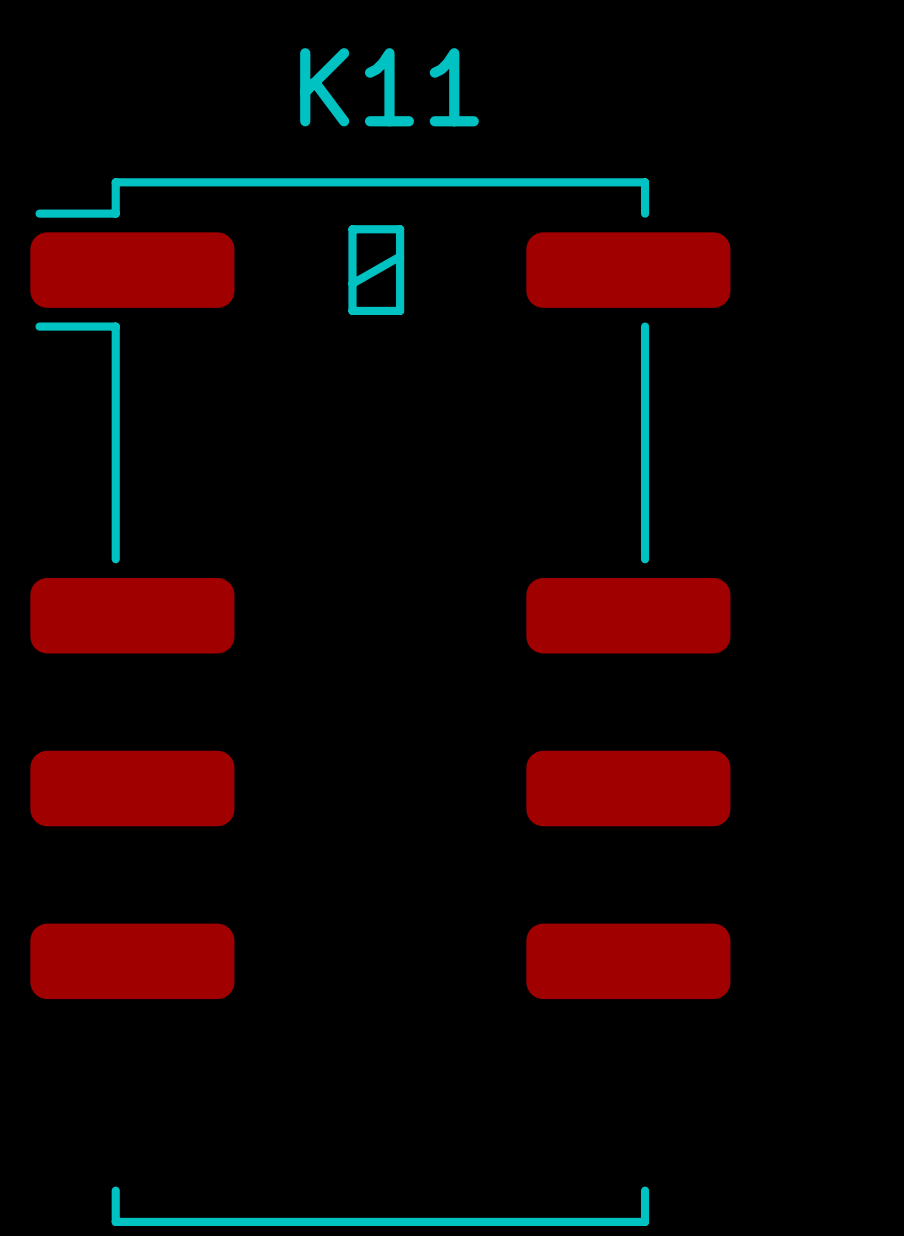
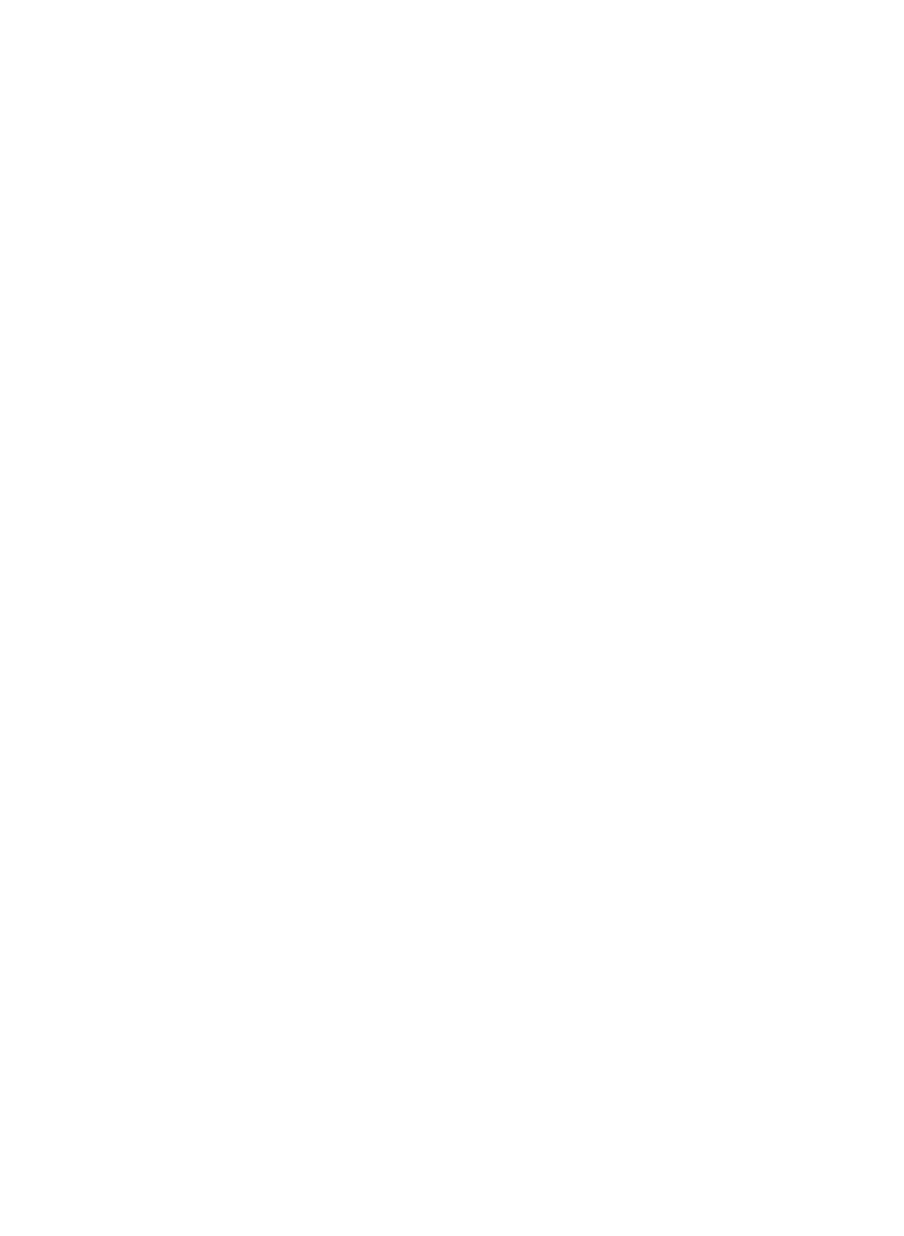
K11: (380, 702) -> none

